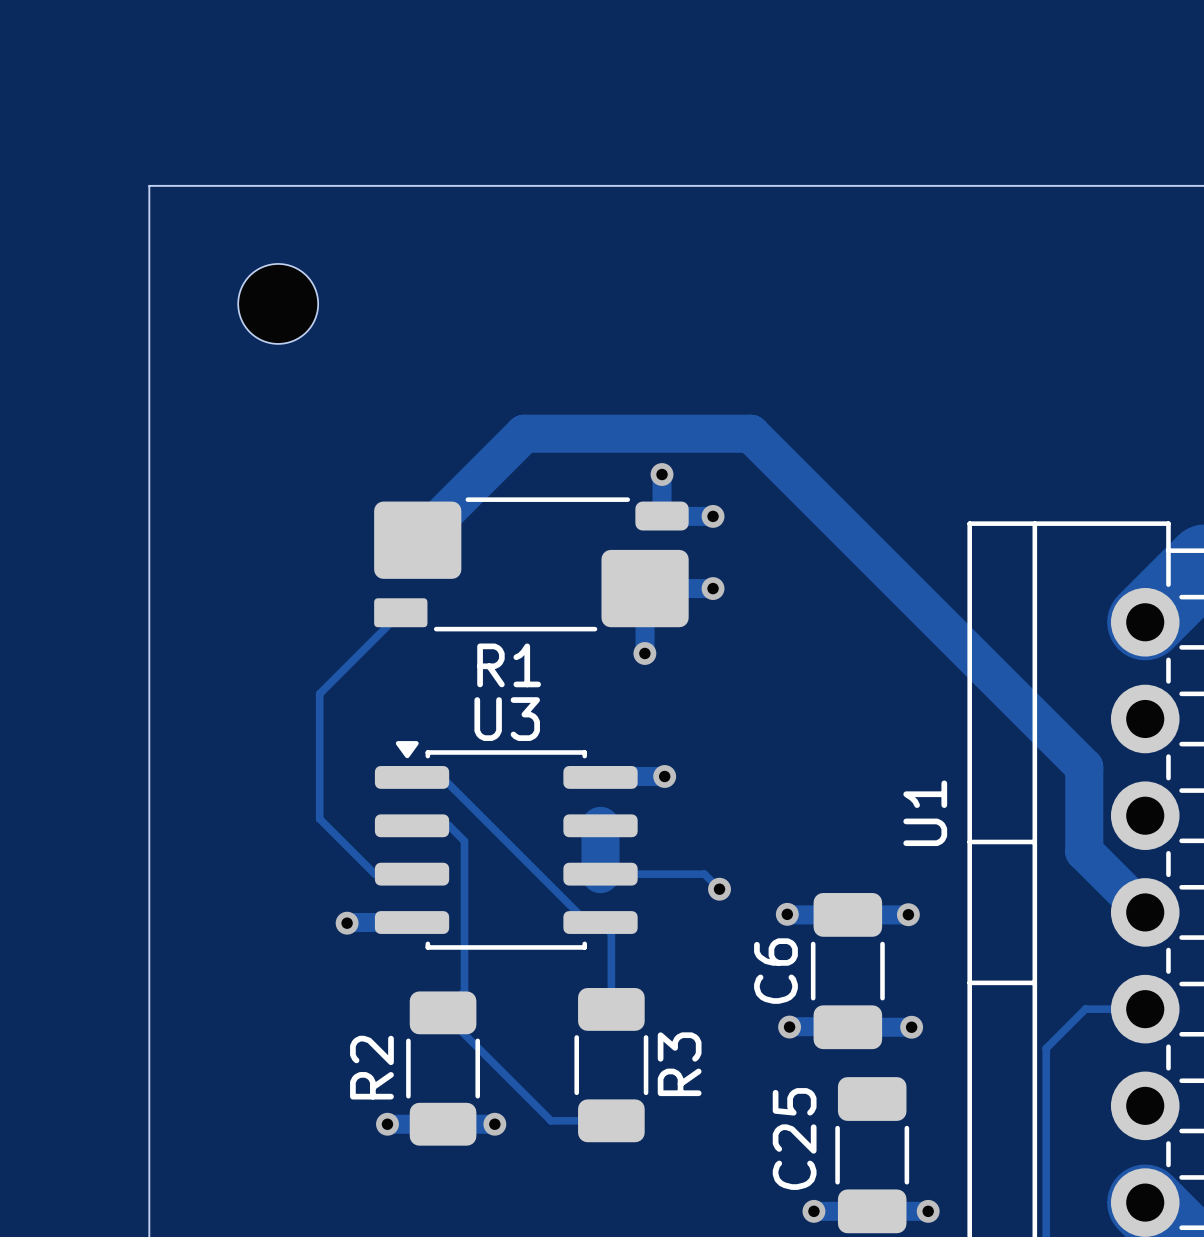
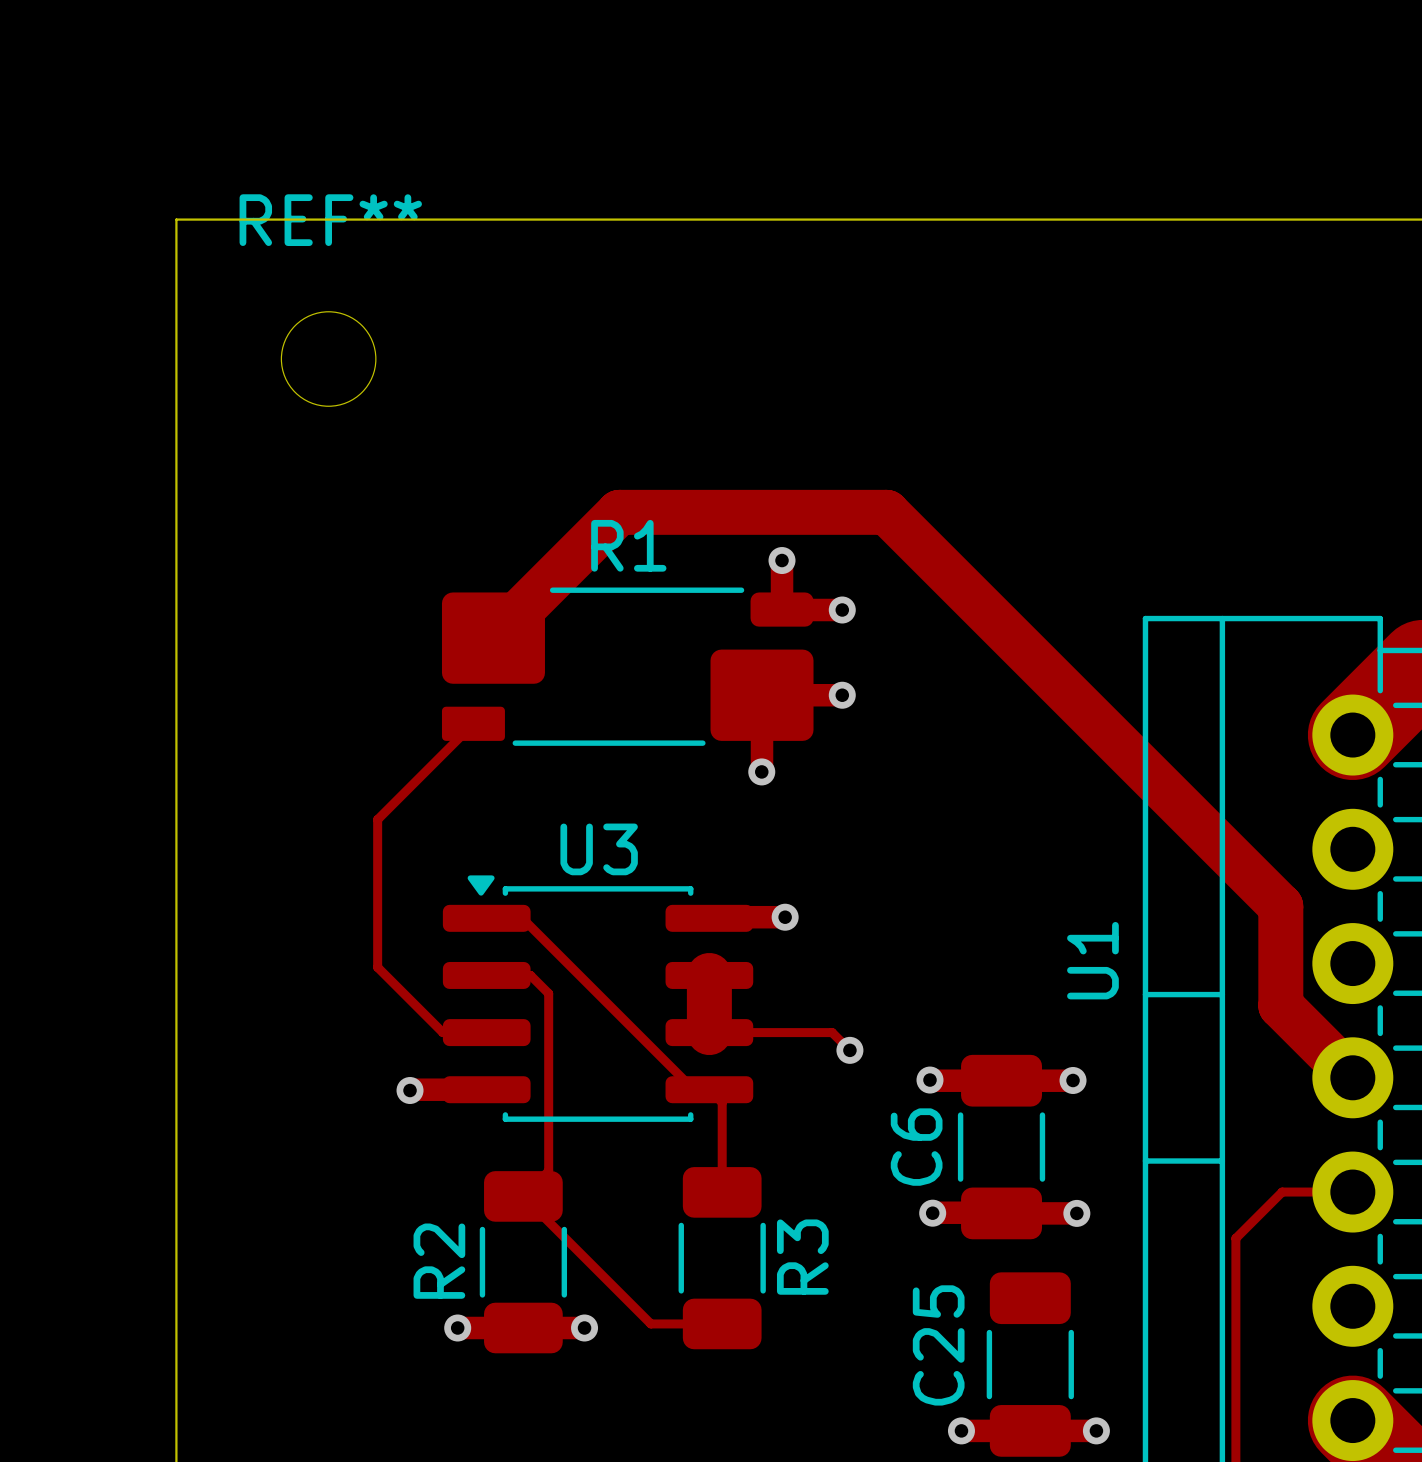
REF** name: none -> REF** (330, 220)
R1 name position: R1 (509, 665) -> R1 (628, 545)

